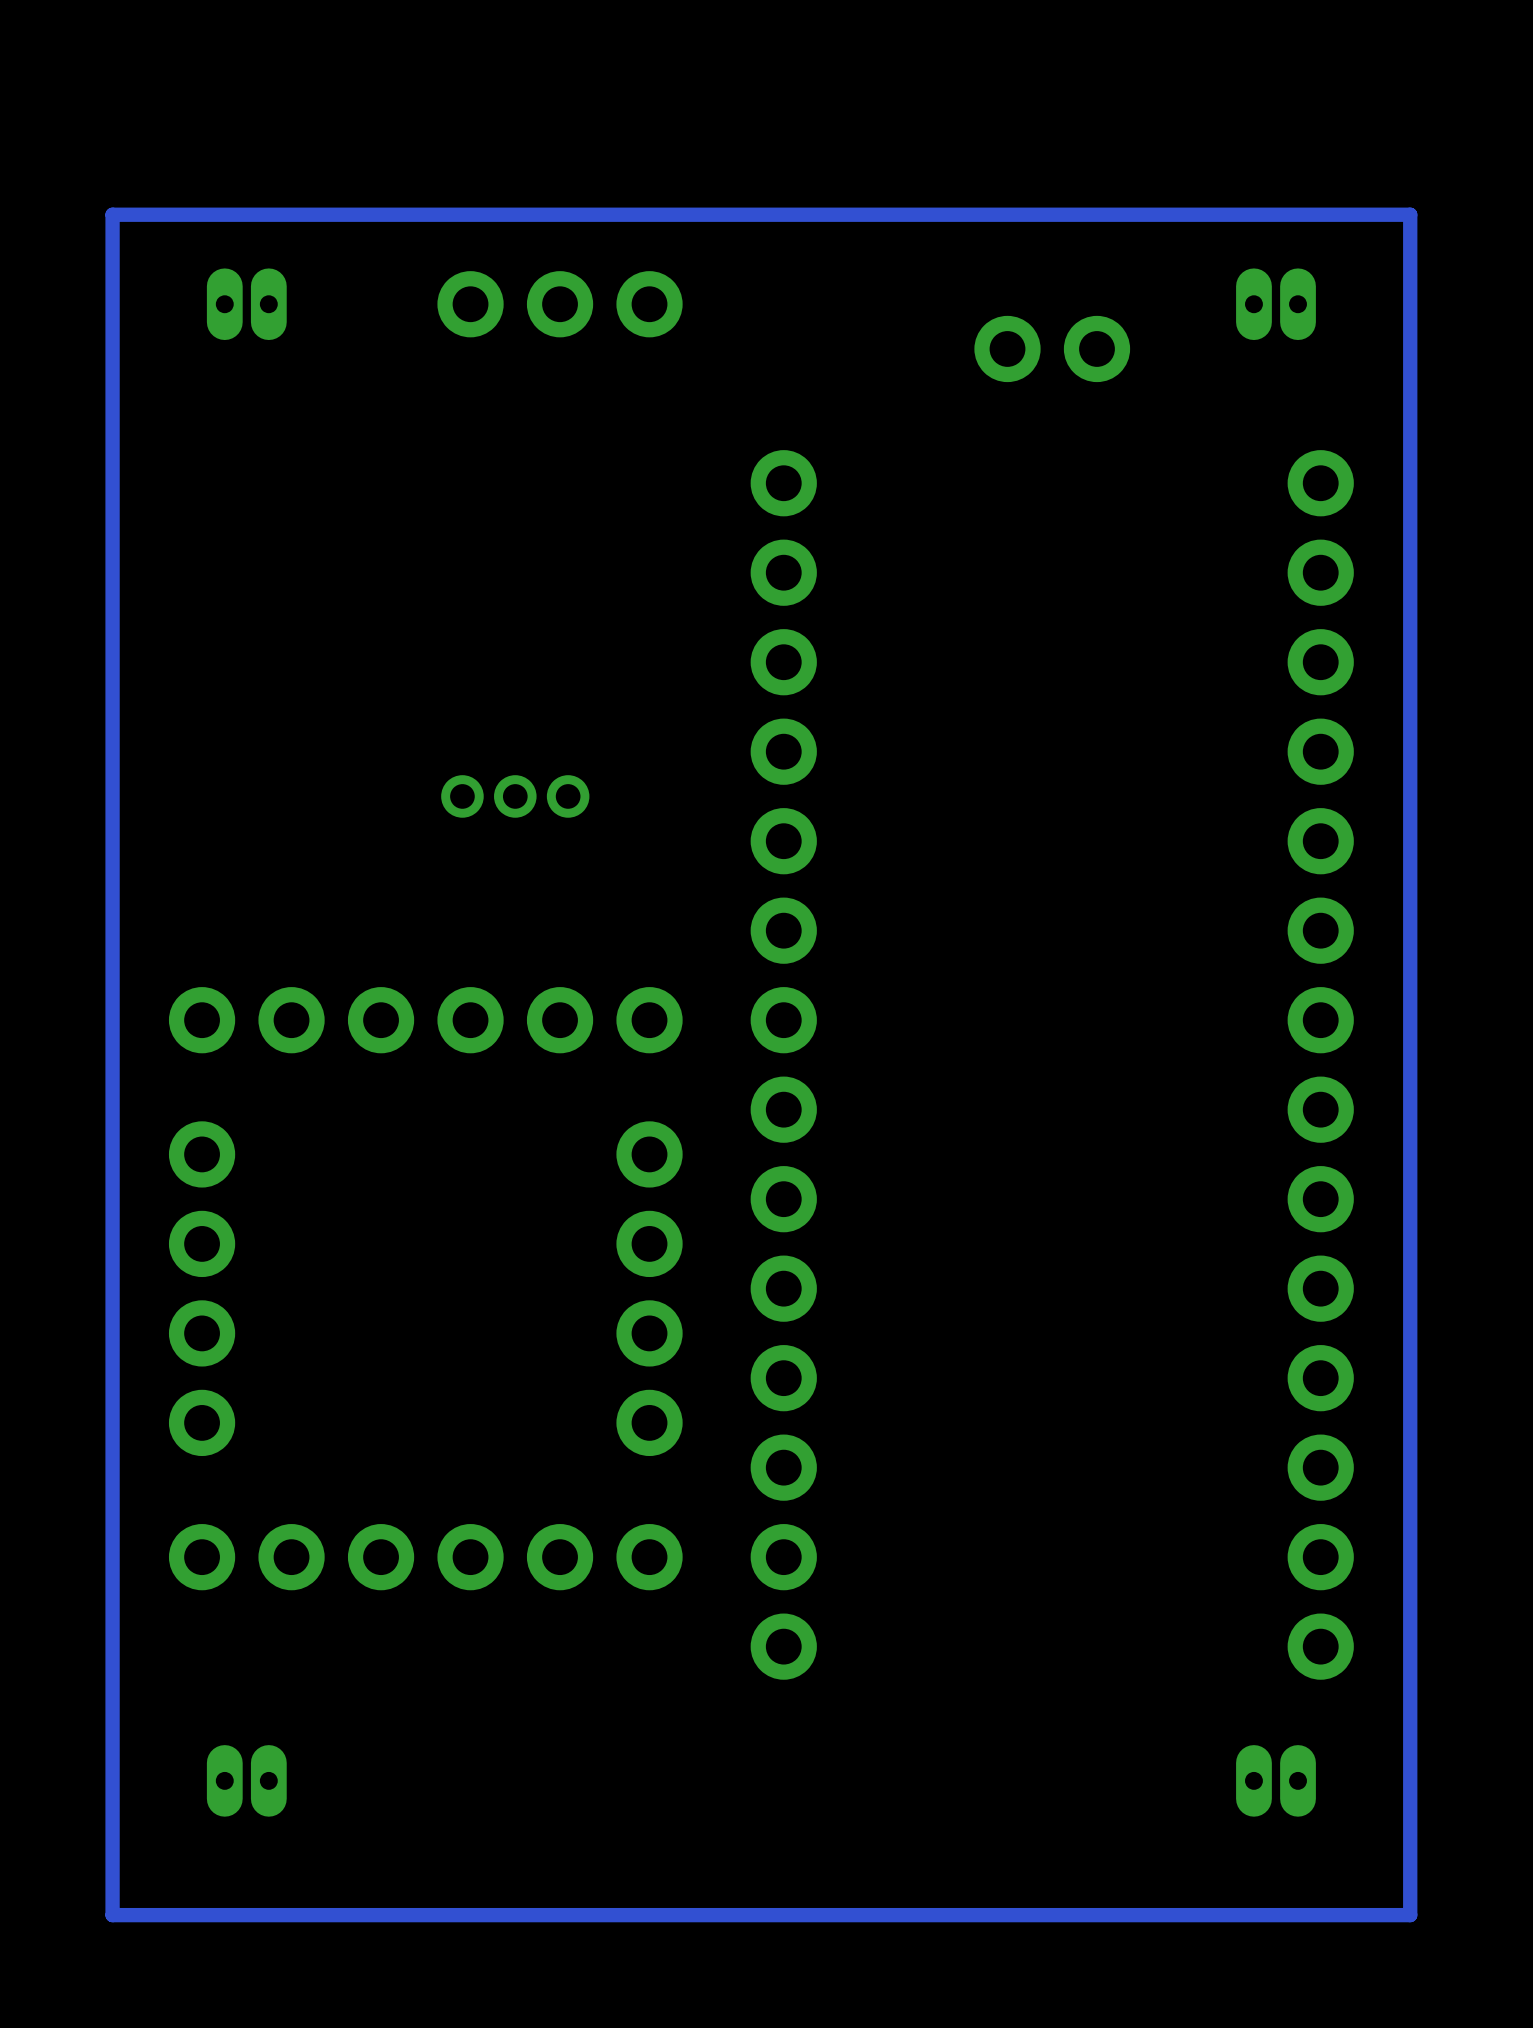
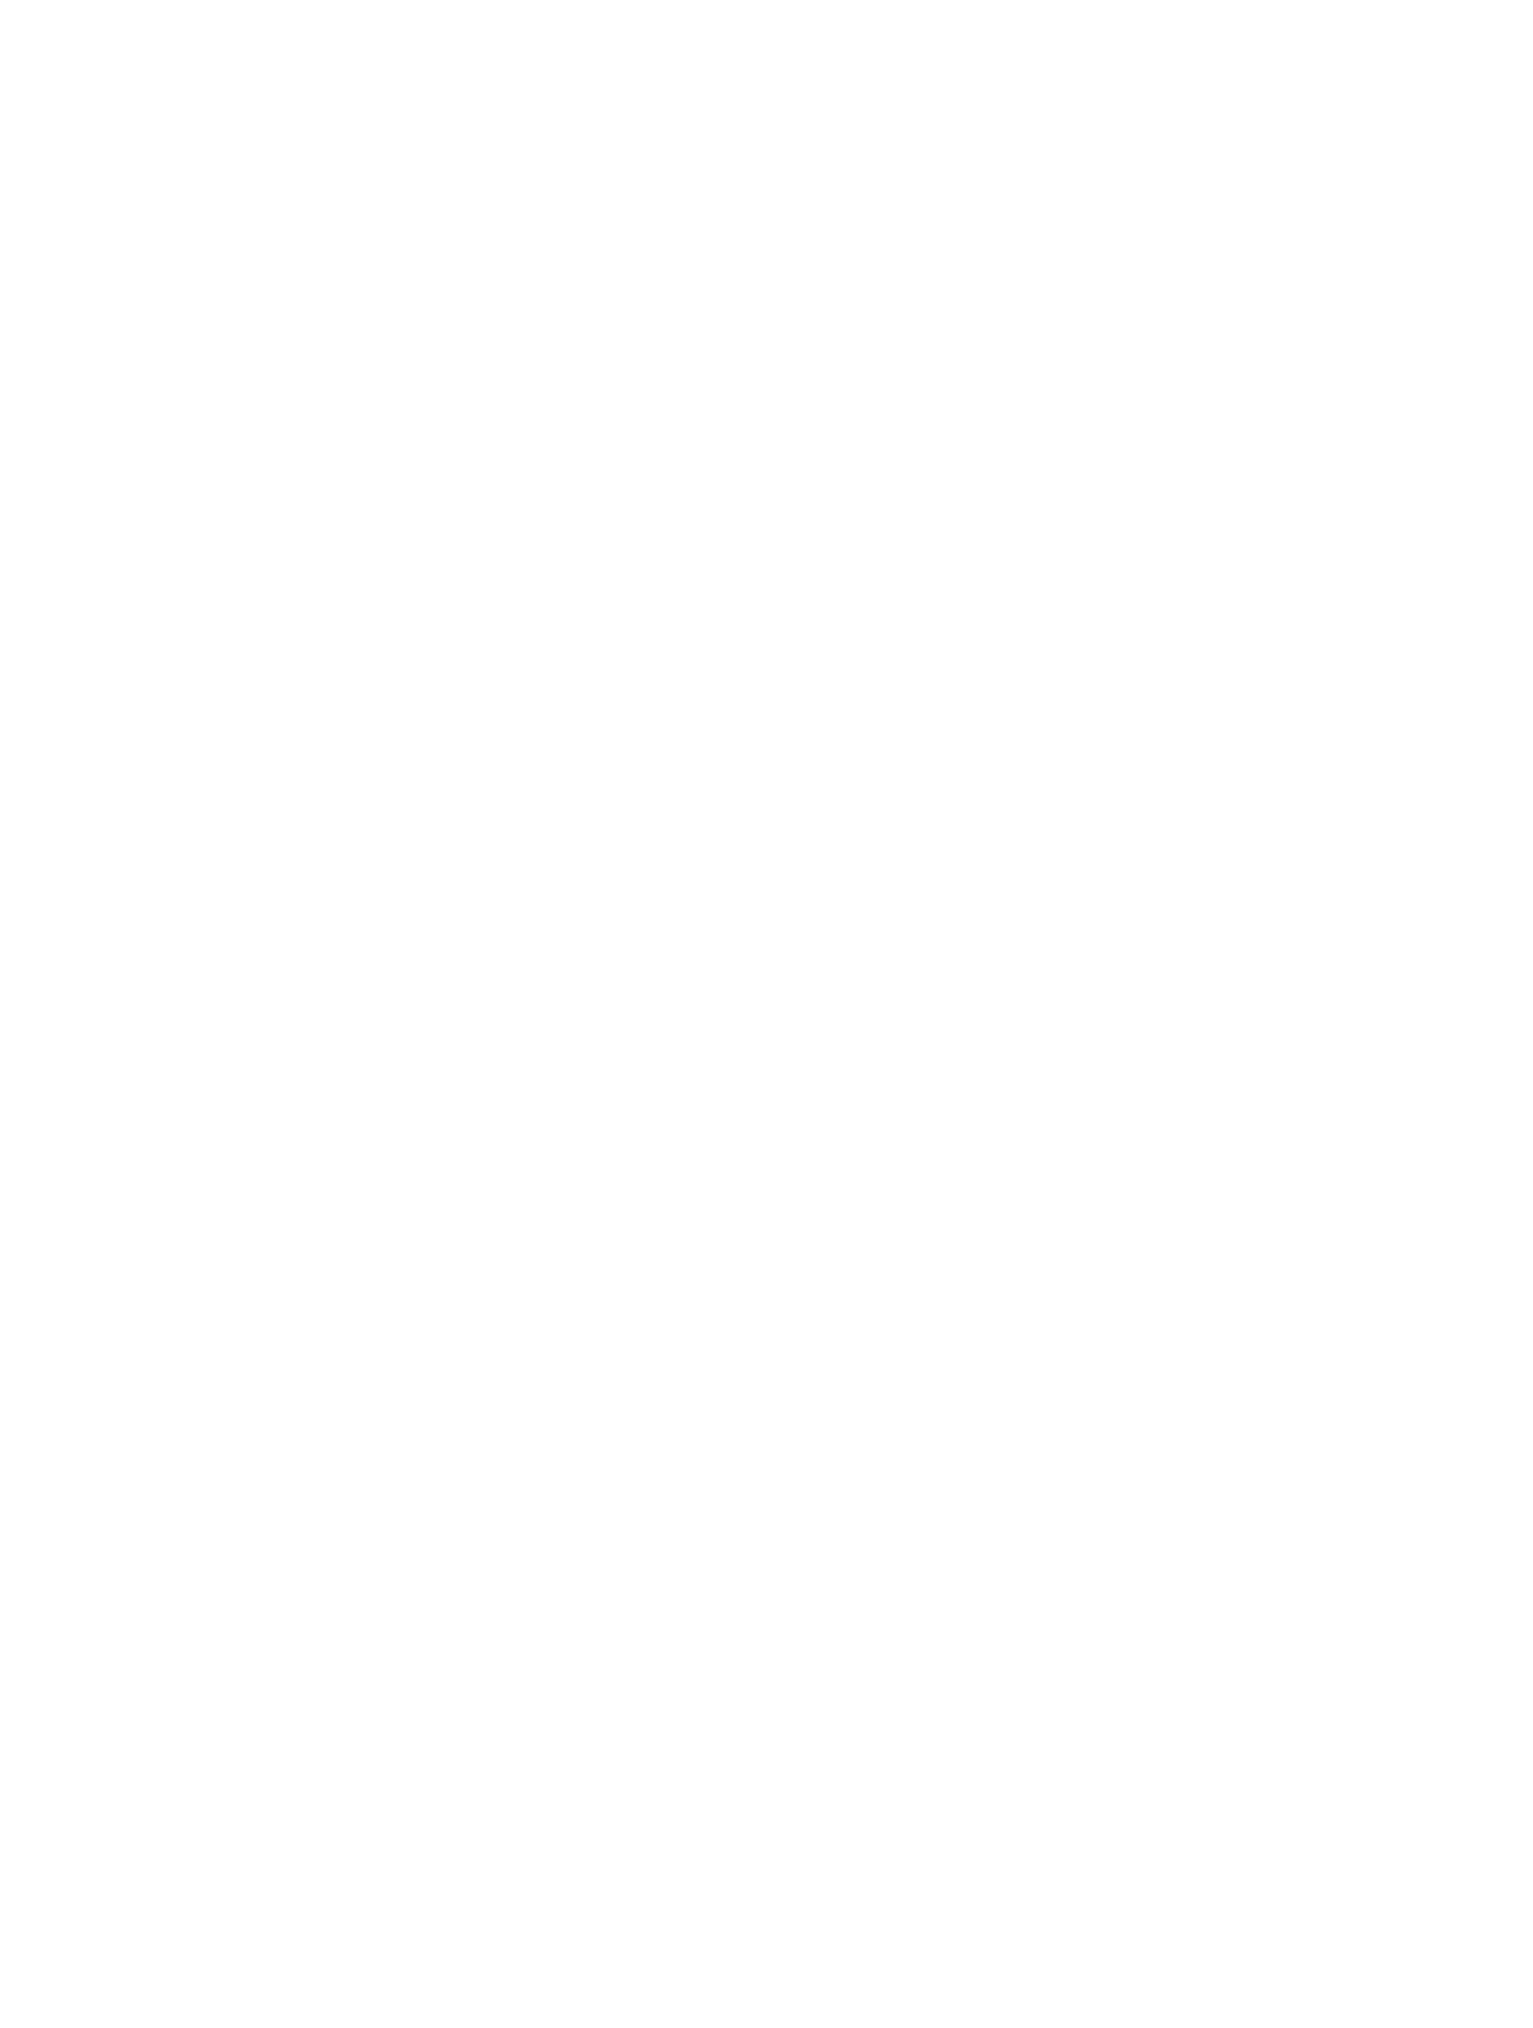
track: (1410, 214) (112, 214) (112, 1915) (1410, 1915) (1410, 214) -> none
part: (246, 304) -> none
part: (560, 304) -> none
part: (1275, 304) -> none
part: (1052, 348) -> none
part: (515, 796) -> none
part: (425, 1020) -> none
part: (783, 1064) -> none
part: (1320, 1064) -> none
part: (202, 1288) -> none
part: (649, 1288) -> none
part: (425, 1557) -> none
part: (246, 1780) -> none
part: (1275, 1780) -> none

